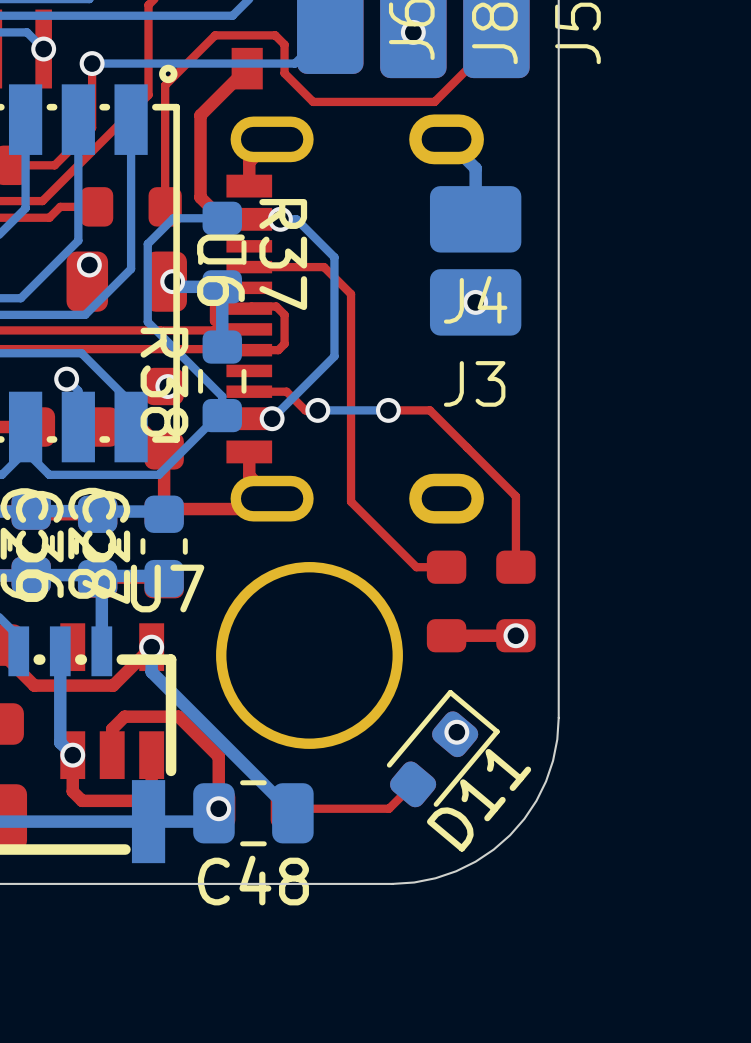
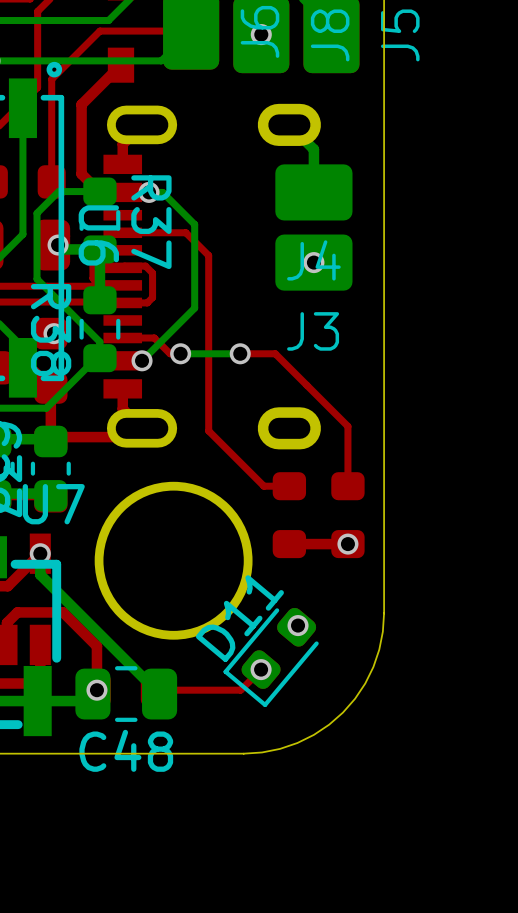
top track: (215, 35) (275, 35) (284, 44) (284, 73) (313, 101) (434, 101) (496, 40) -> (93, 37) (99, 31) (191, 31)
D11 rotation: 0° (443, 748) -> 180° (271, 657)
via: none -> (261, 669)

